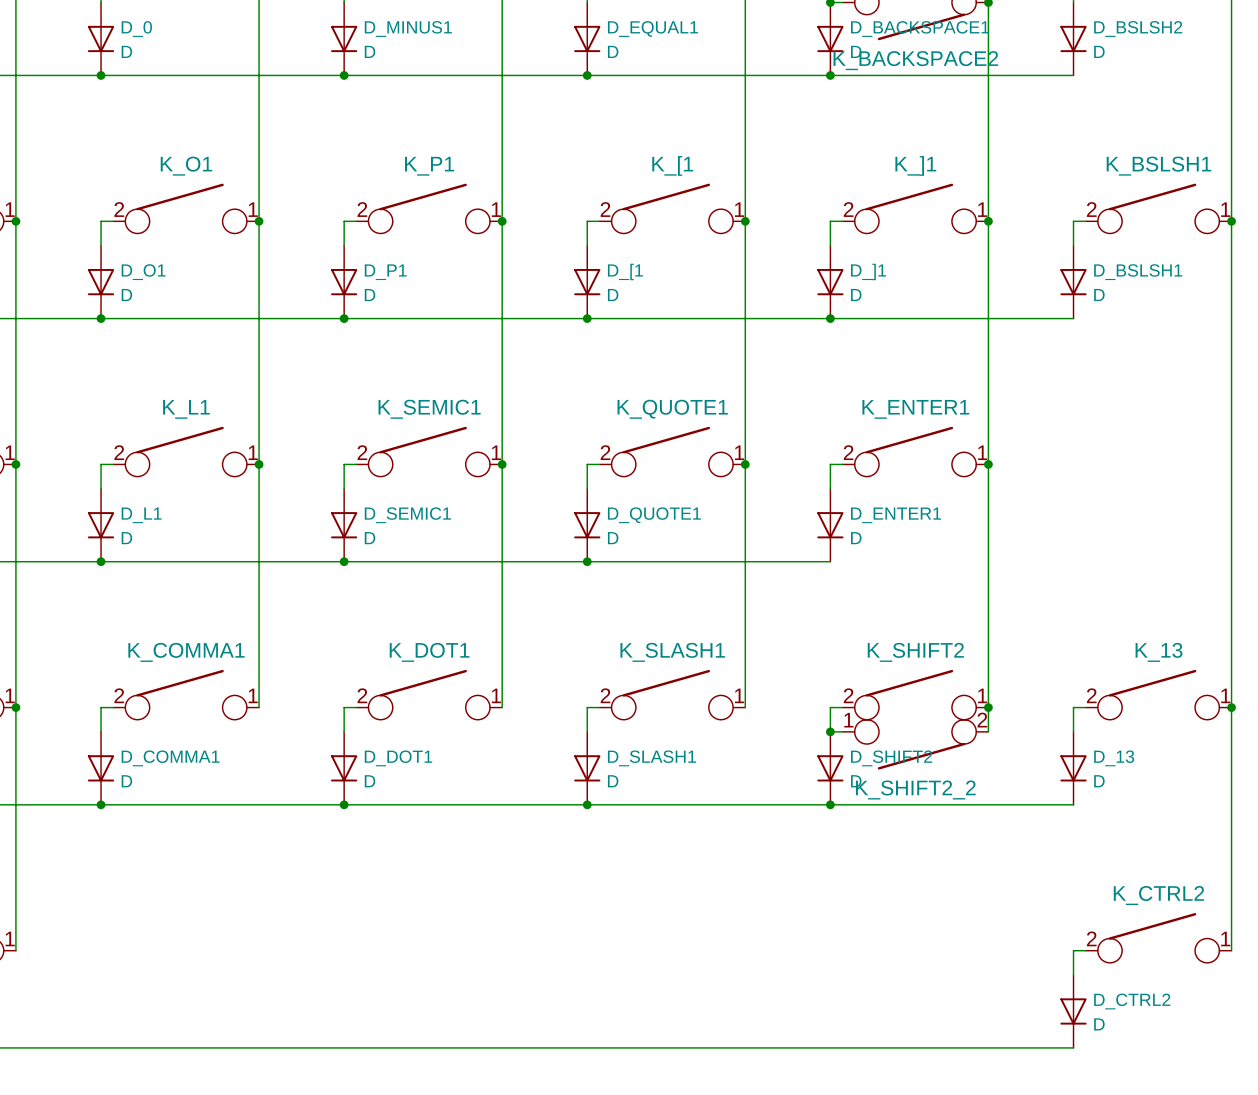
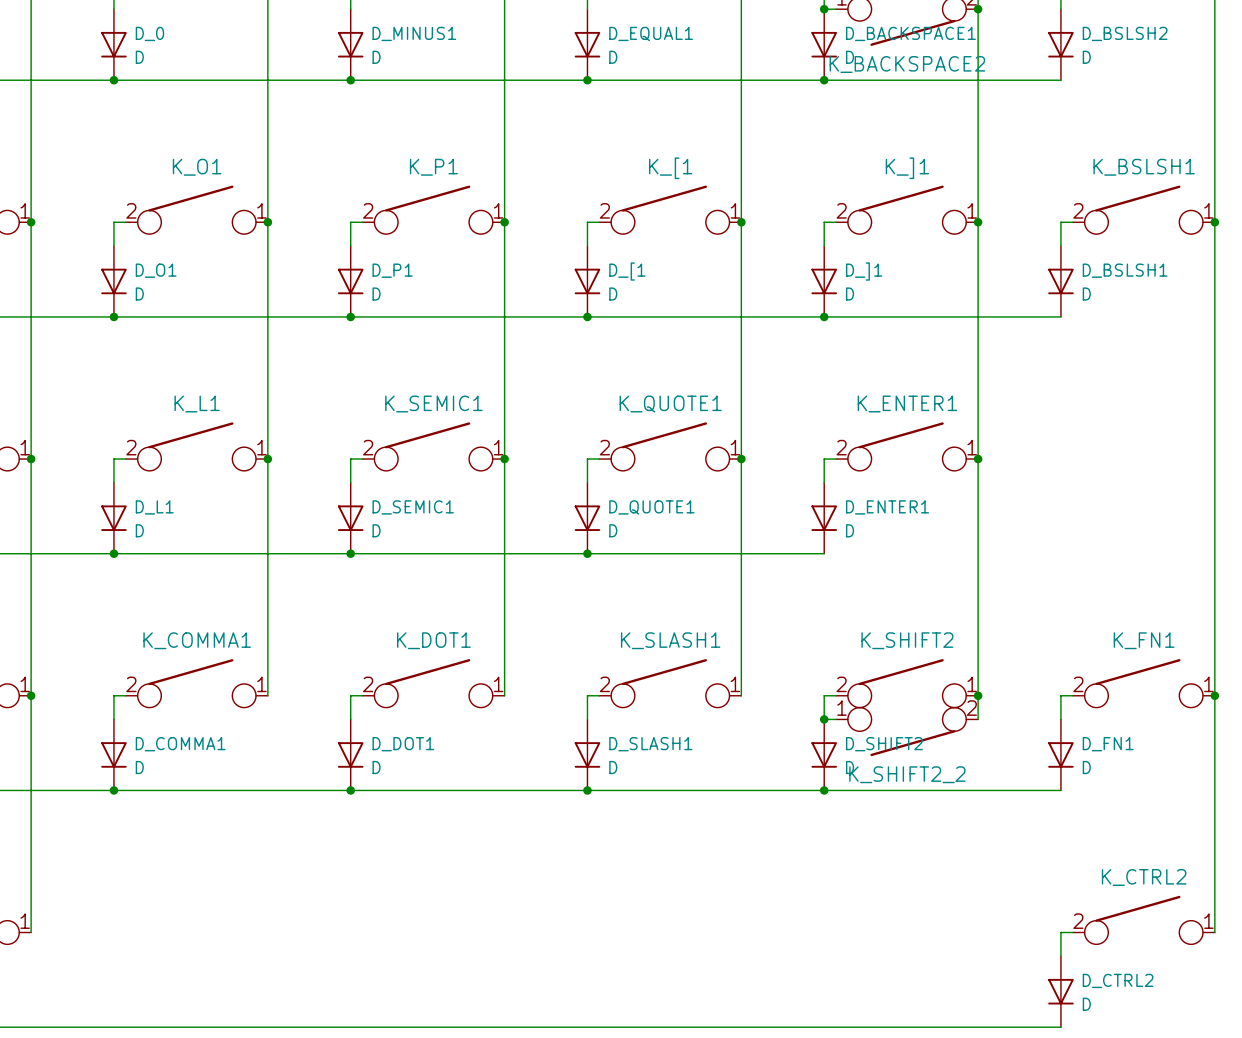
K_13 name: K_13 (1159, 652) -> K_FN1 (1144, 640)
D_13 name: D_13 (1114, 758) -> D_FN1 (1108, 744)

